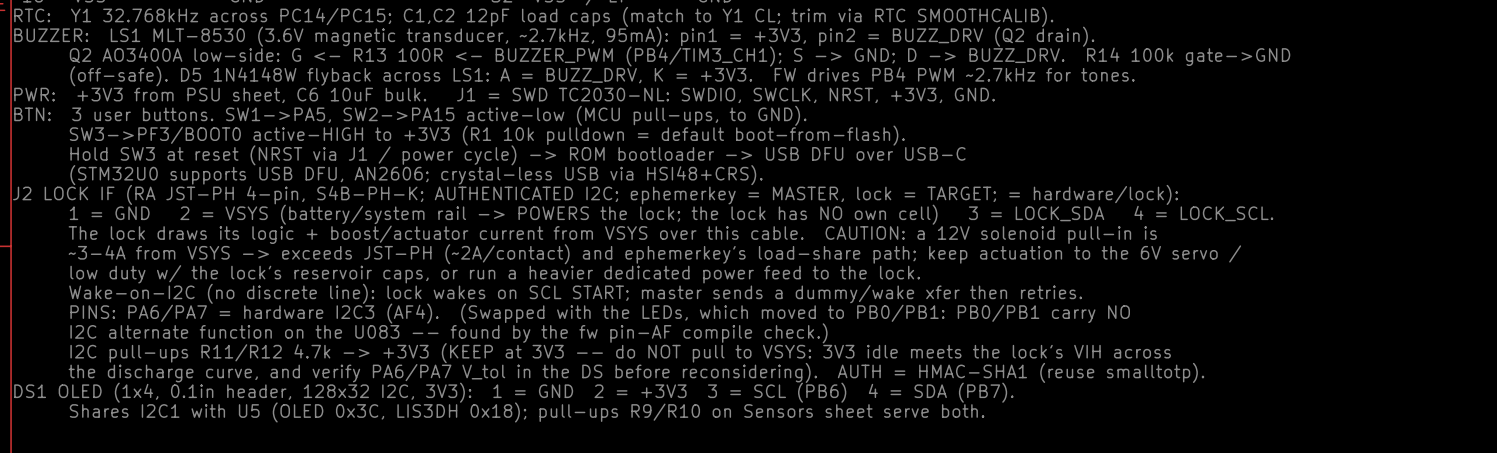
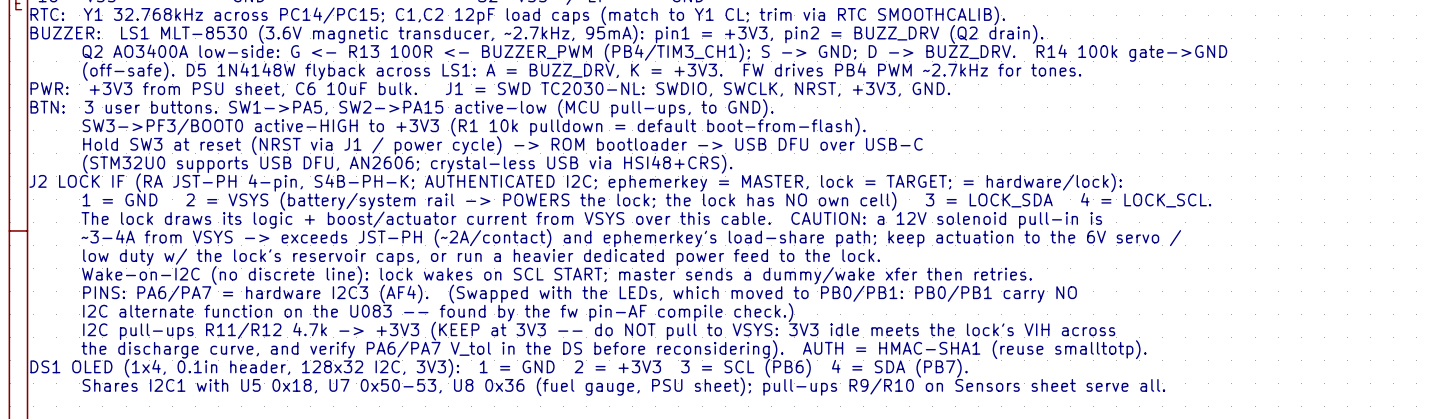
text: Shares I2C1 with U5 (OLED 0x3C, LIS3DH 0x18); pull-ups R9/R10 on Sensors sheet serve both. (527, 412) -> Shares I2C1 with U5 0x18, U7 0x50-53, U8 0x36 (fuel gauge, PSU sheet); pull-ups R9/R10 on Sensors sheet serve all. (623, 386)

